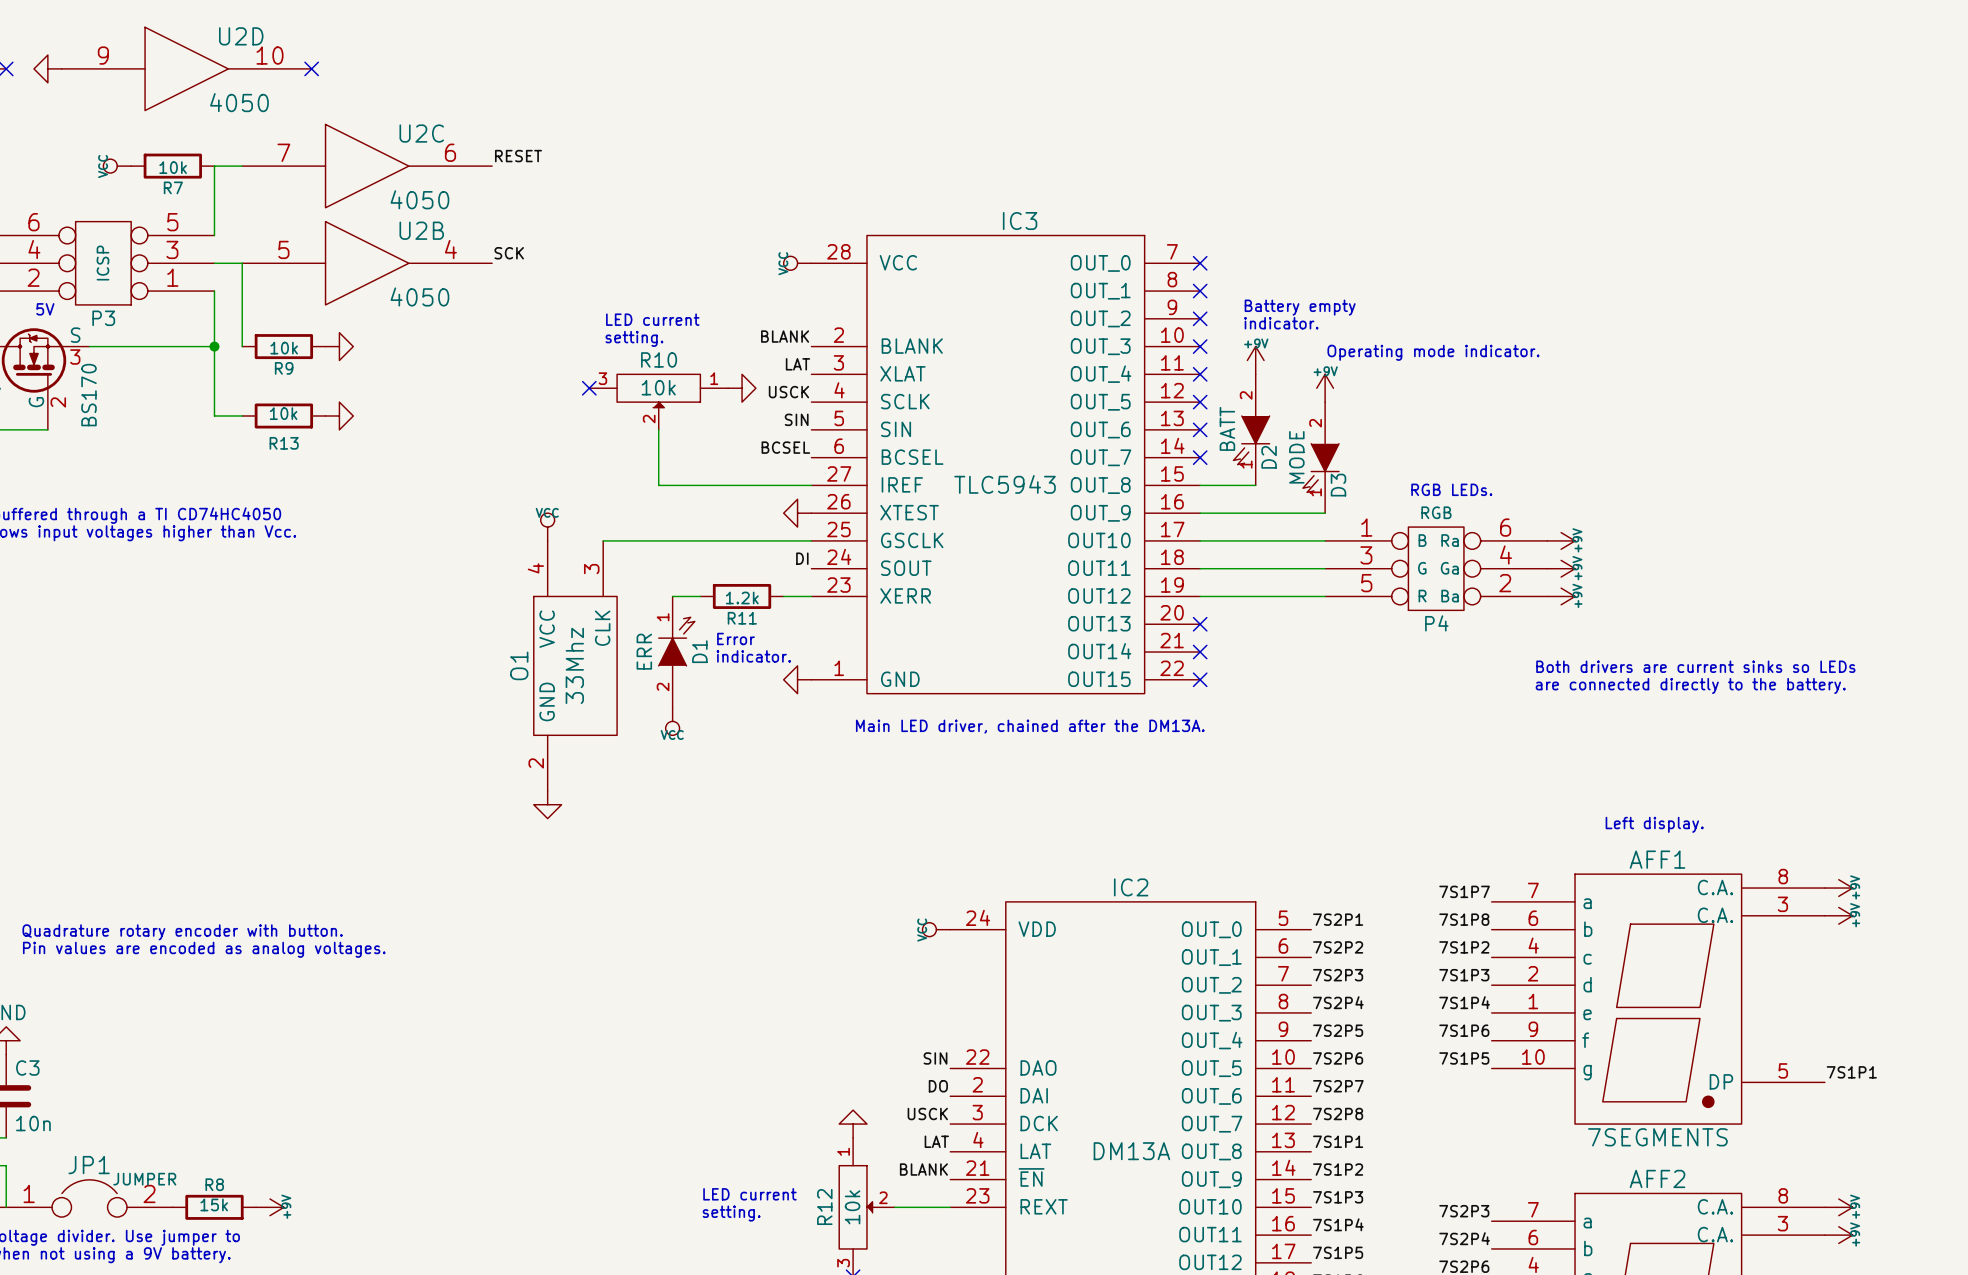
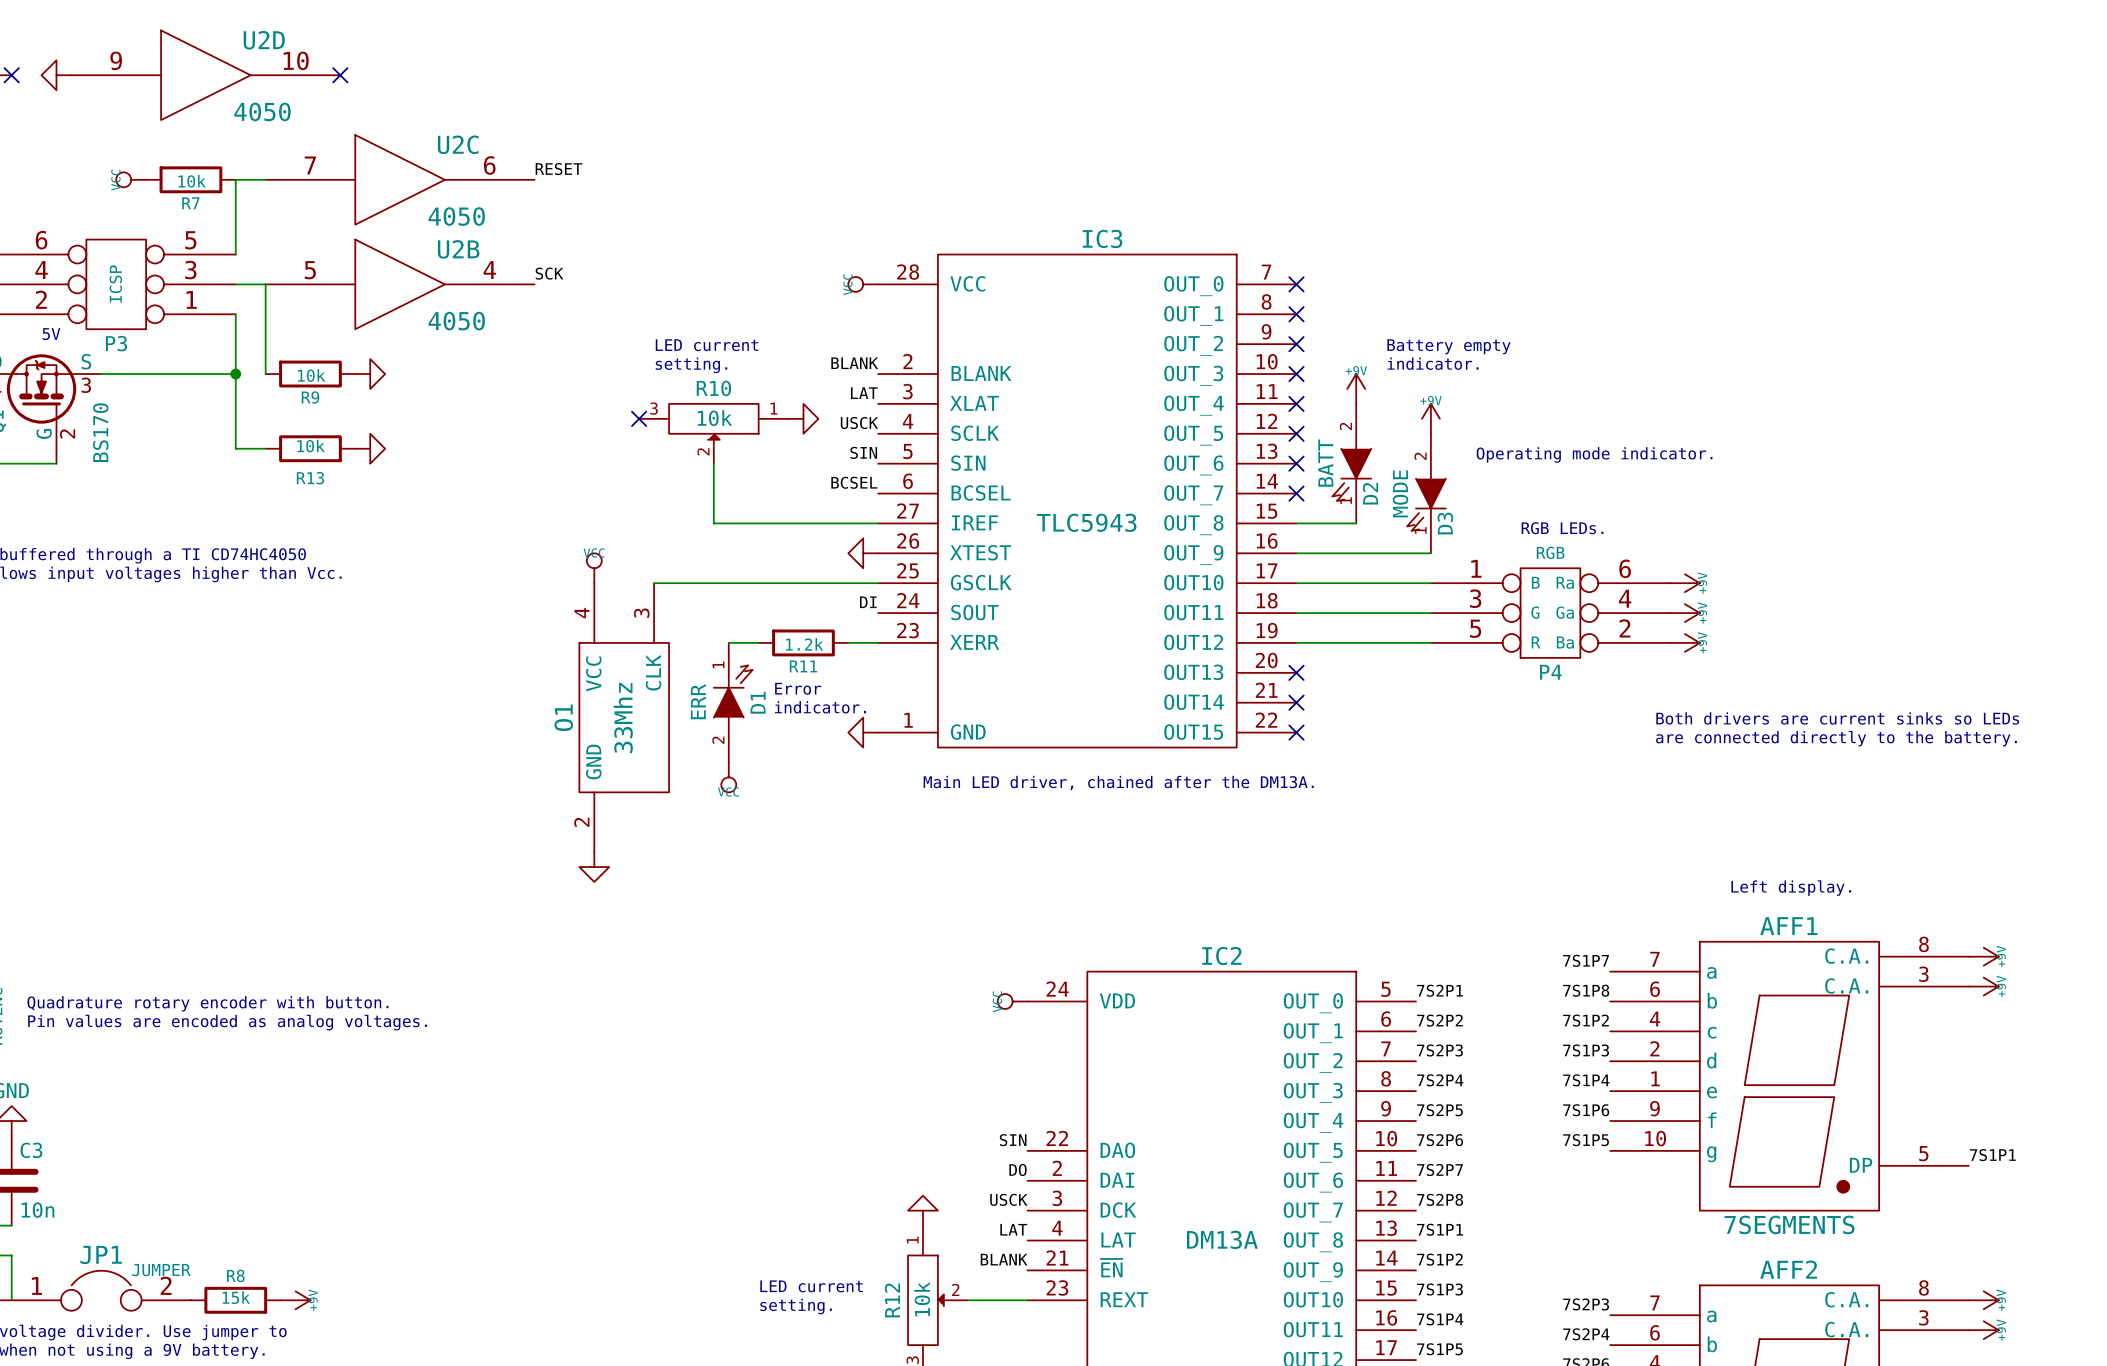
text position: Battery empty (1300, 307) -> Battery empty (1449, 346)
text position: indicator. (1281, 323) -> indicator. (1433, 363)
text position: Operating mode indicator. (1433, 352) -> Operating mode indicator. (1594, 454)

